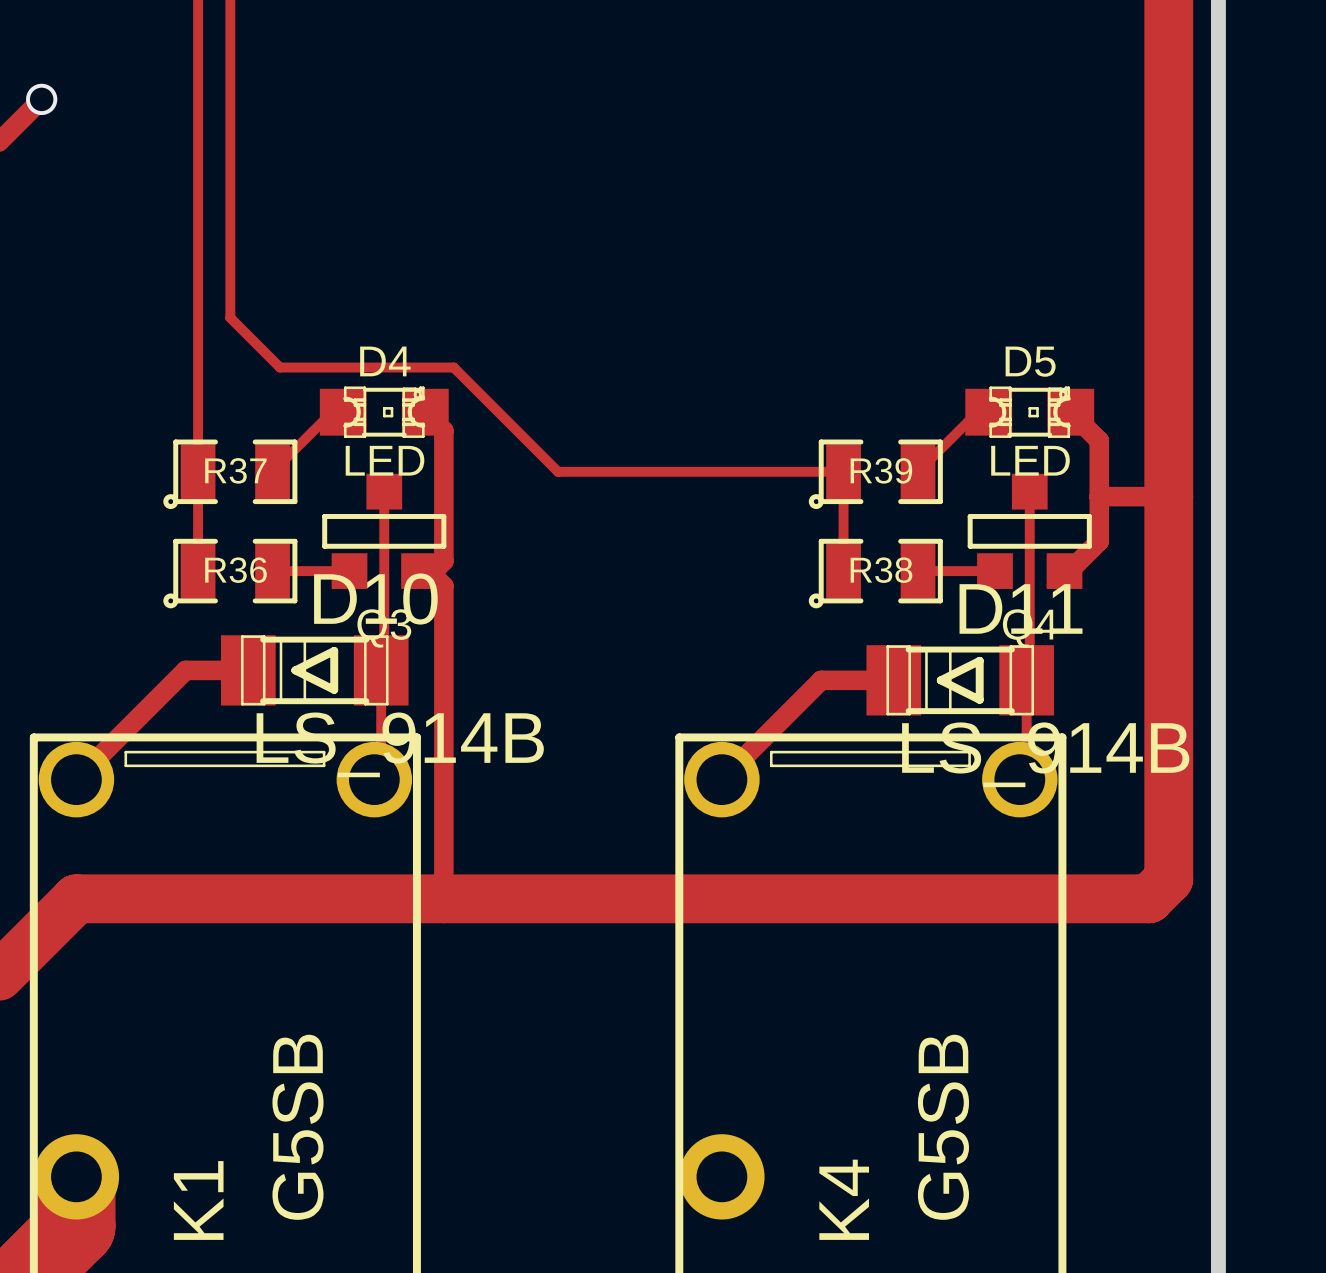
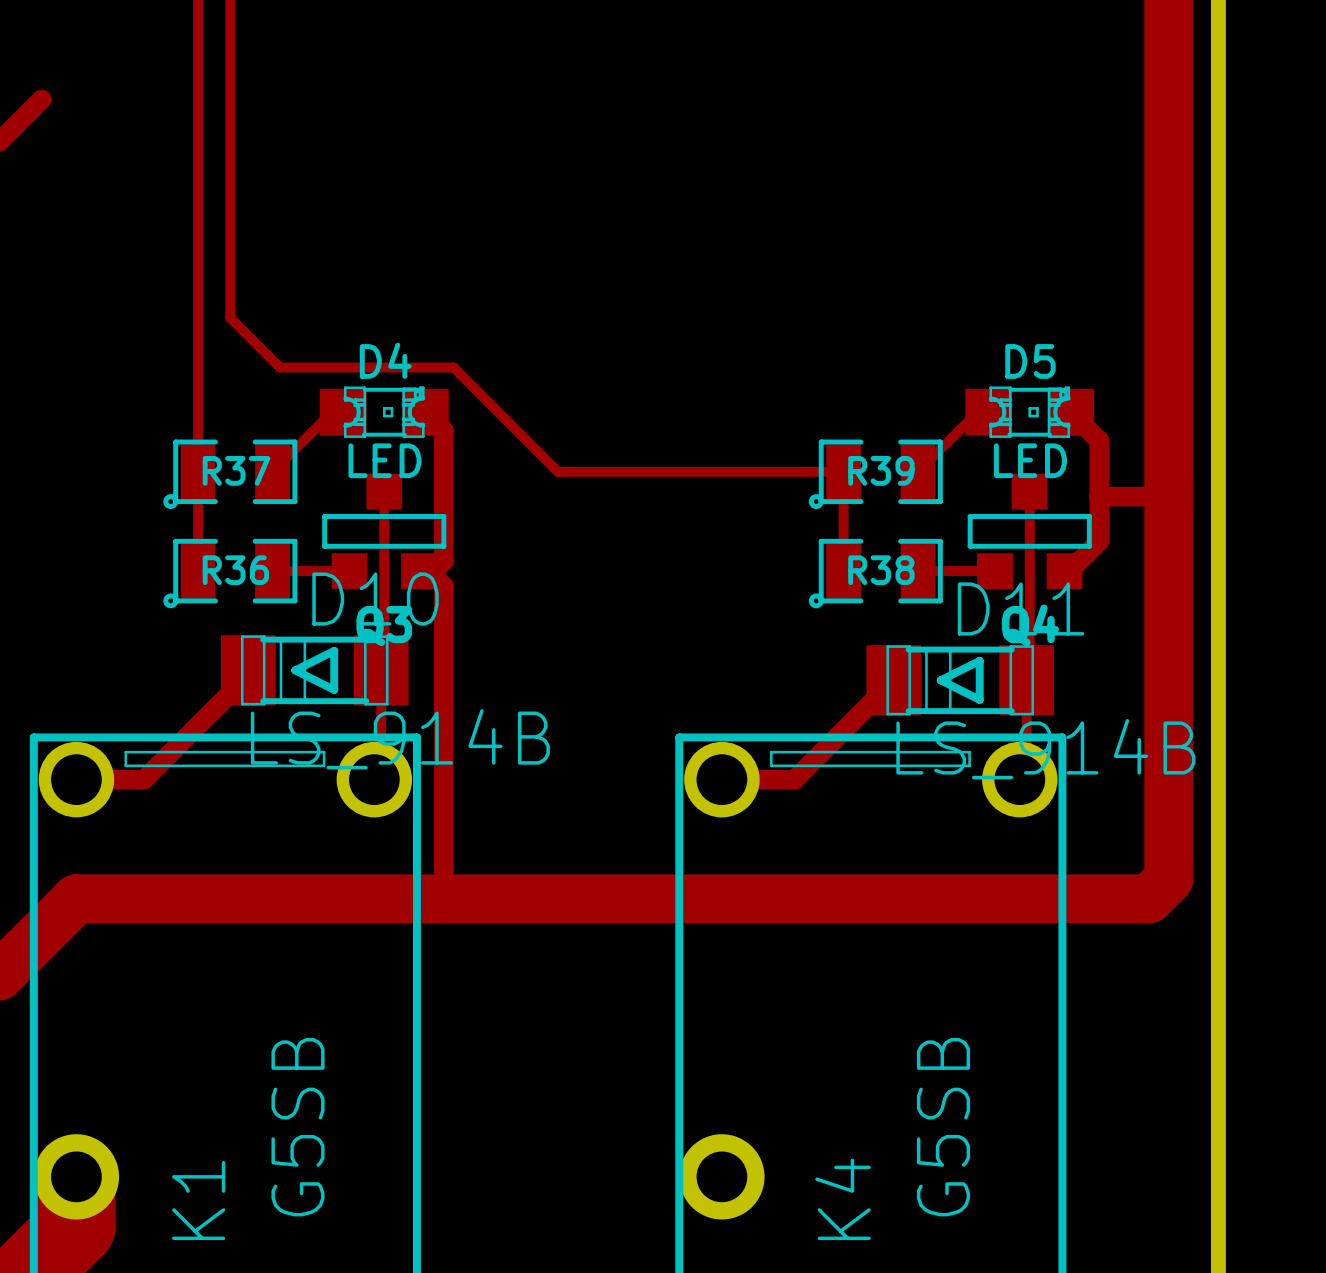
via: (41, 99) -> none
track: (248, 670) (185, 670) (76, 779) -> (248, 675) (144, 779) (76, 779)
track: (893, 680) (821, 680) (721, 779) -> (893, 680) (794, 779) (721, 779)

